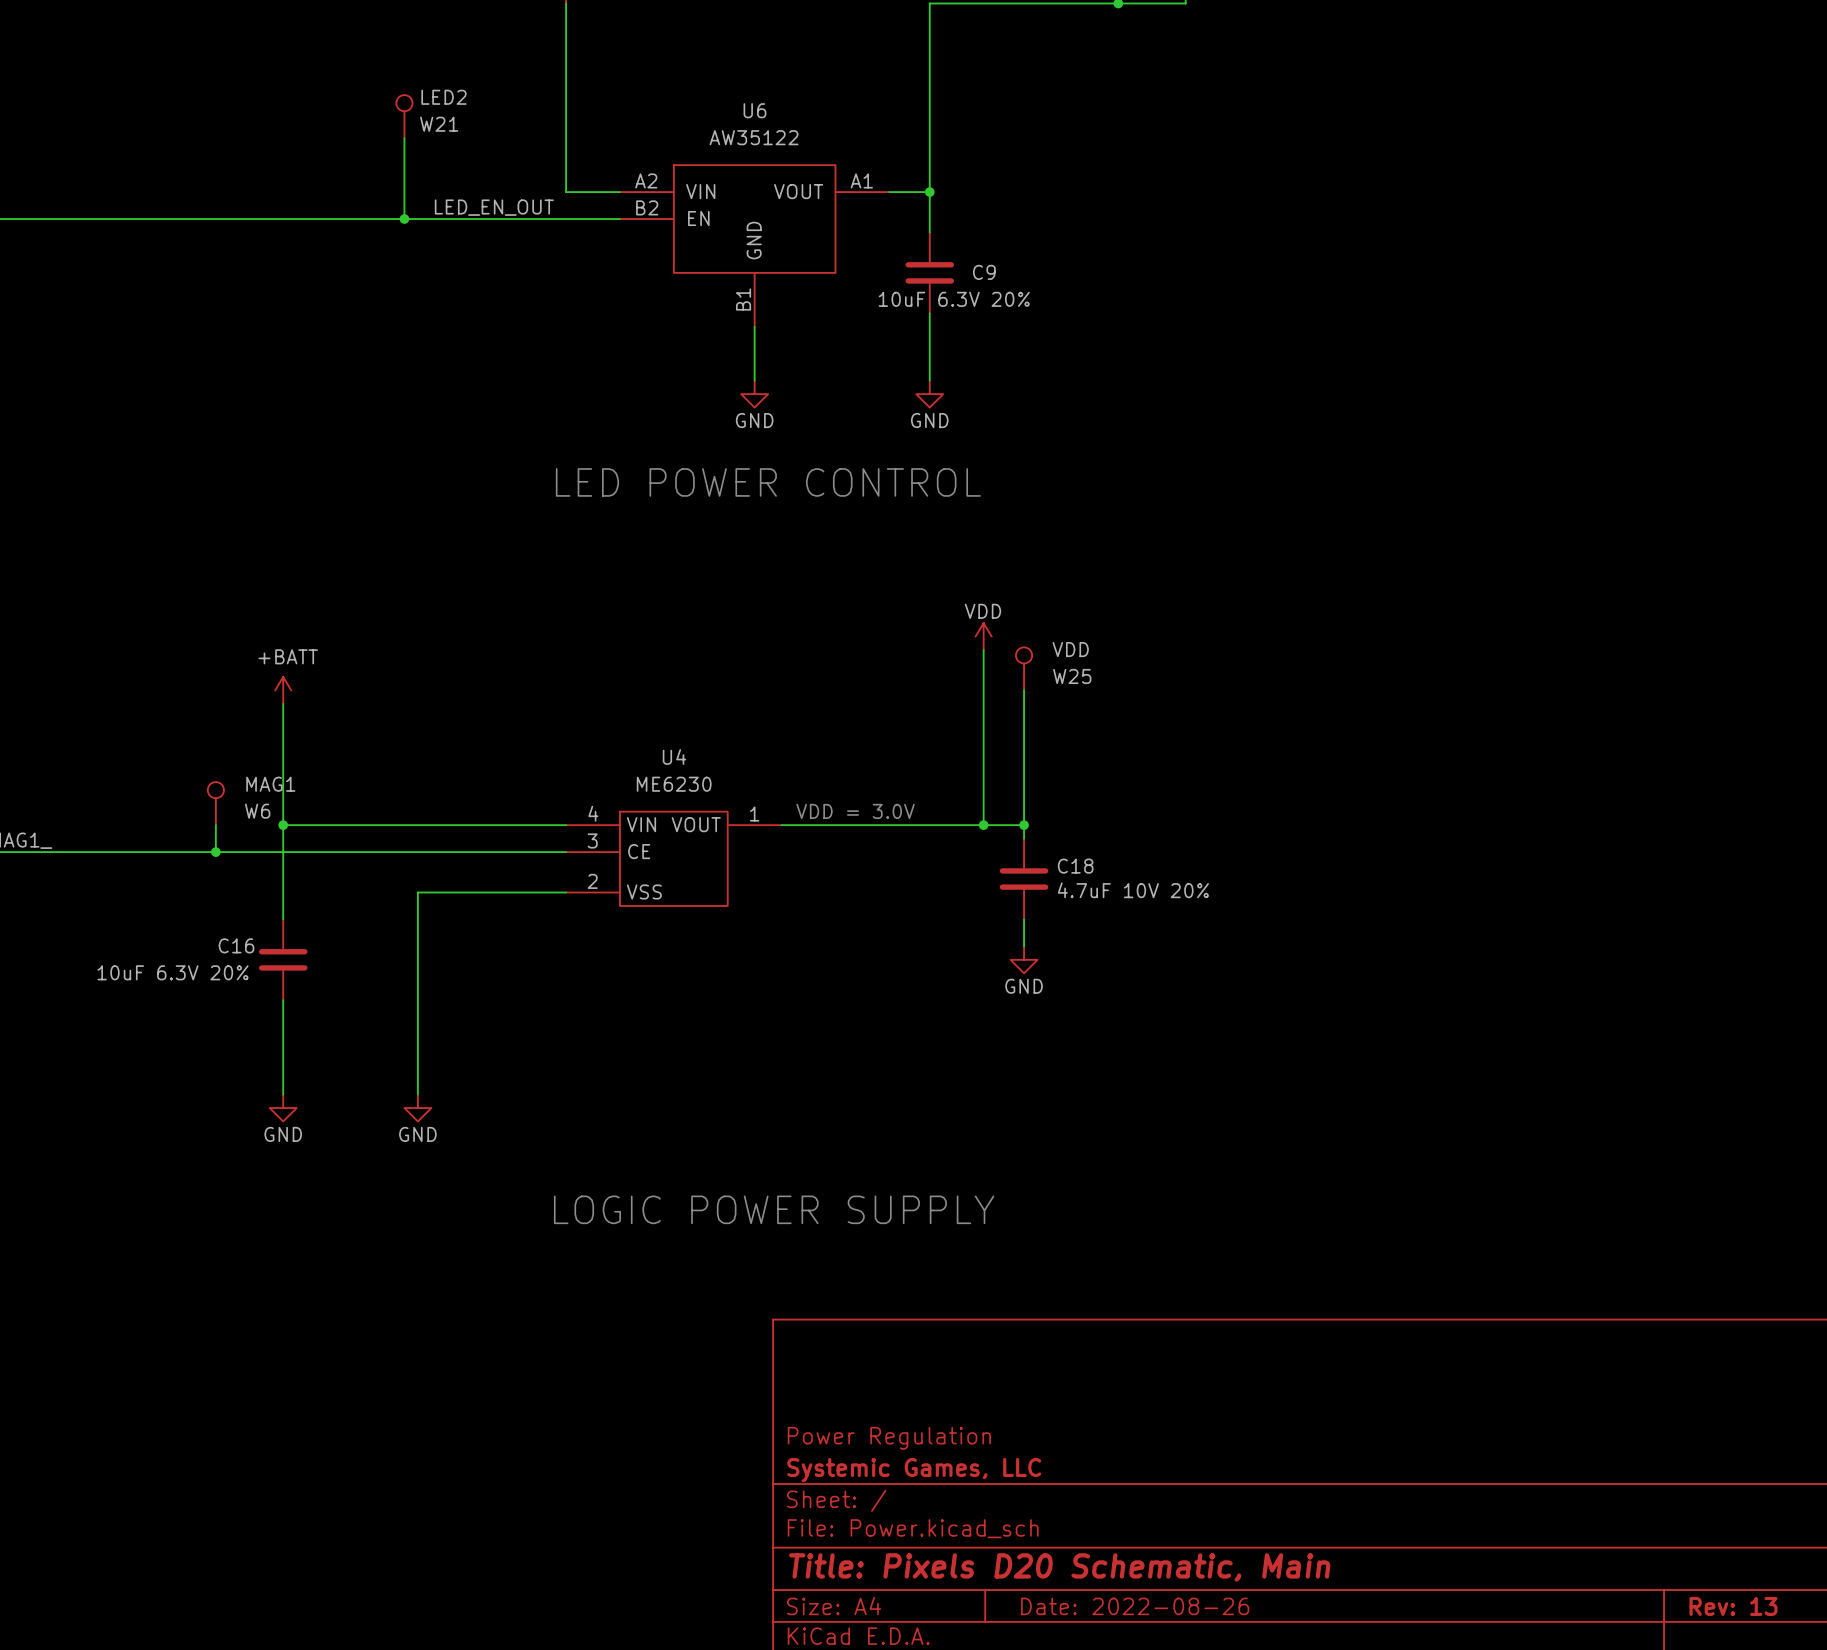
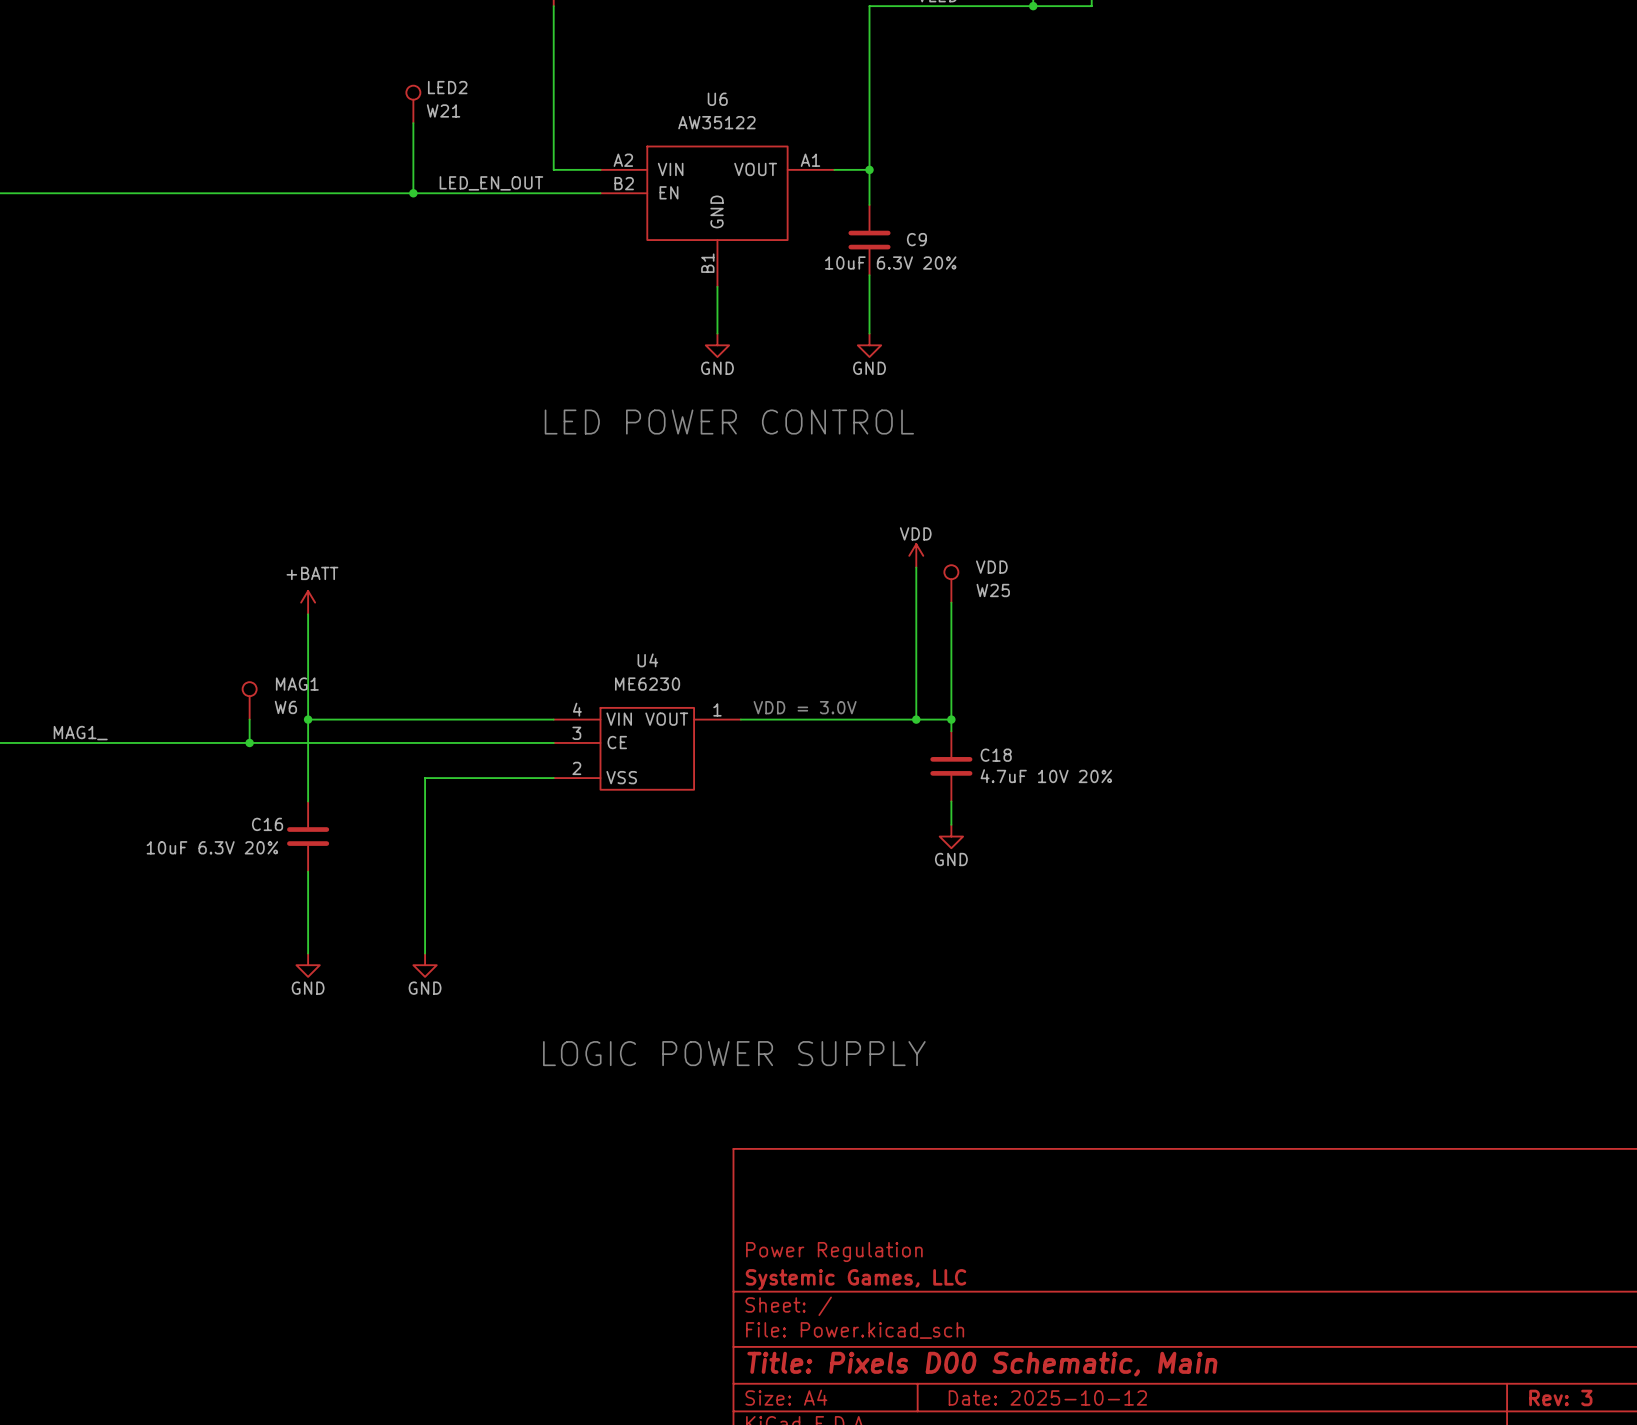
title block: Title: Pixels D20 Schematic, Main (1059, 1567) -> Title: Pixels D00 Schematic, Main (982, 1364)
title block: Date: 2022-08-26 (1135, 1606) -> Date: 2025-10-12 (1047, 1397)
title block: Rev: 13 (1733, 1606) -> Rev: 3 (1560, 1397)

